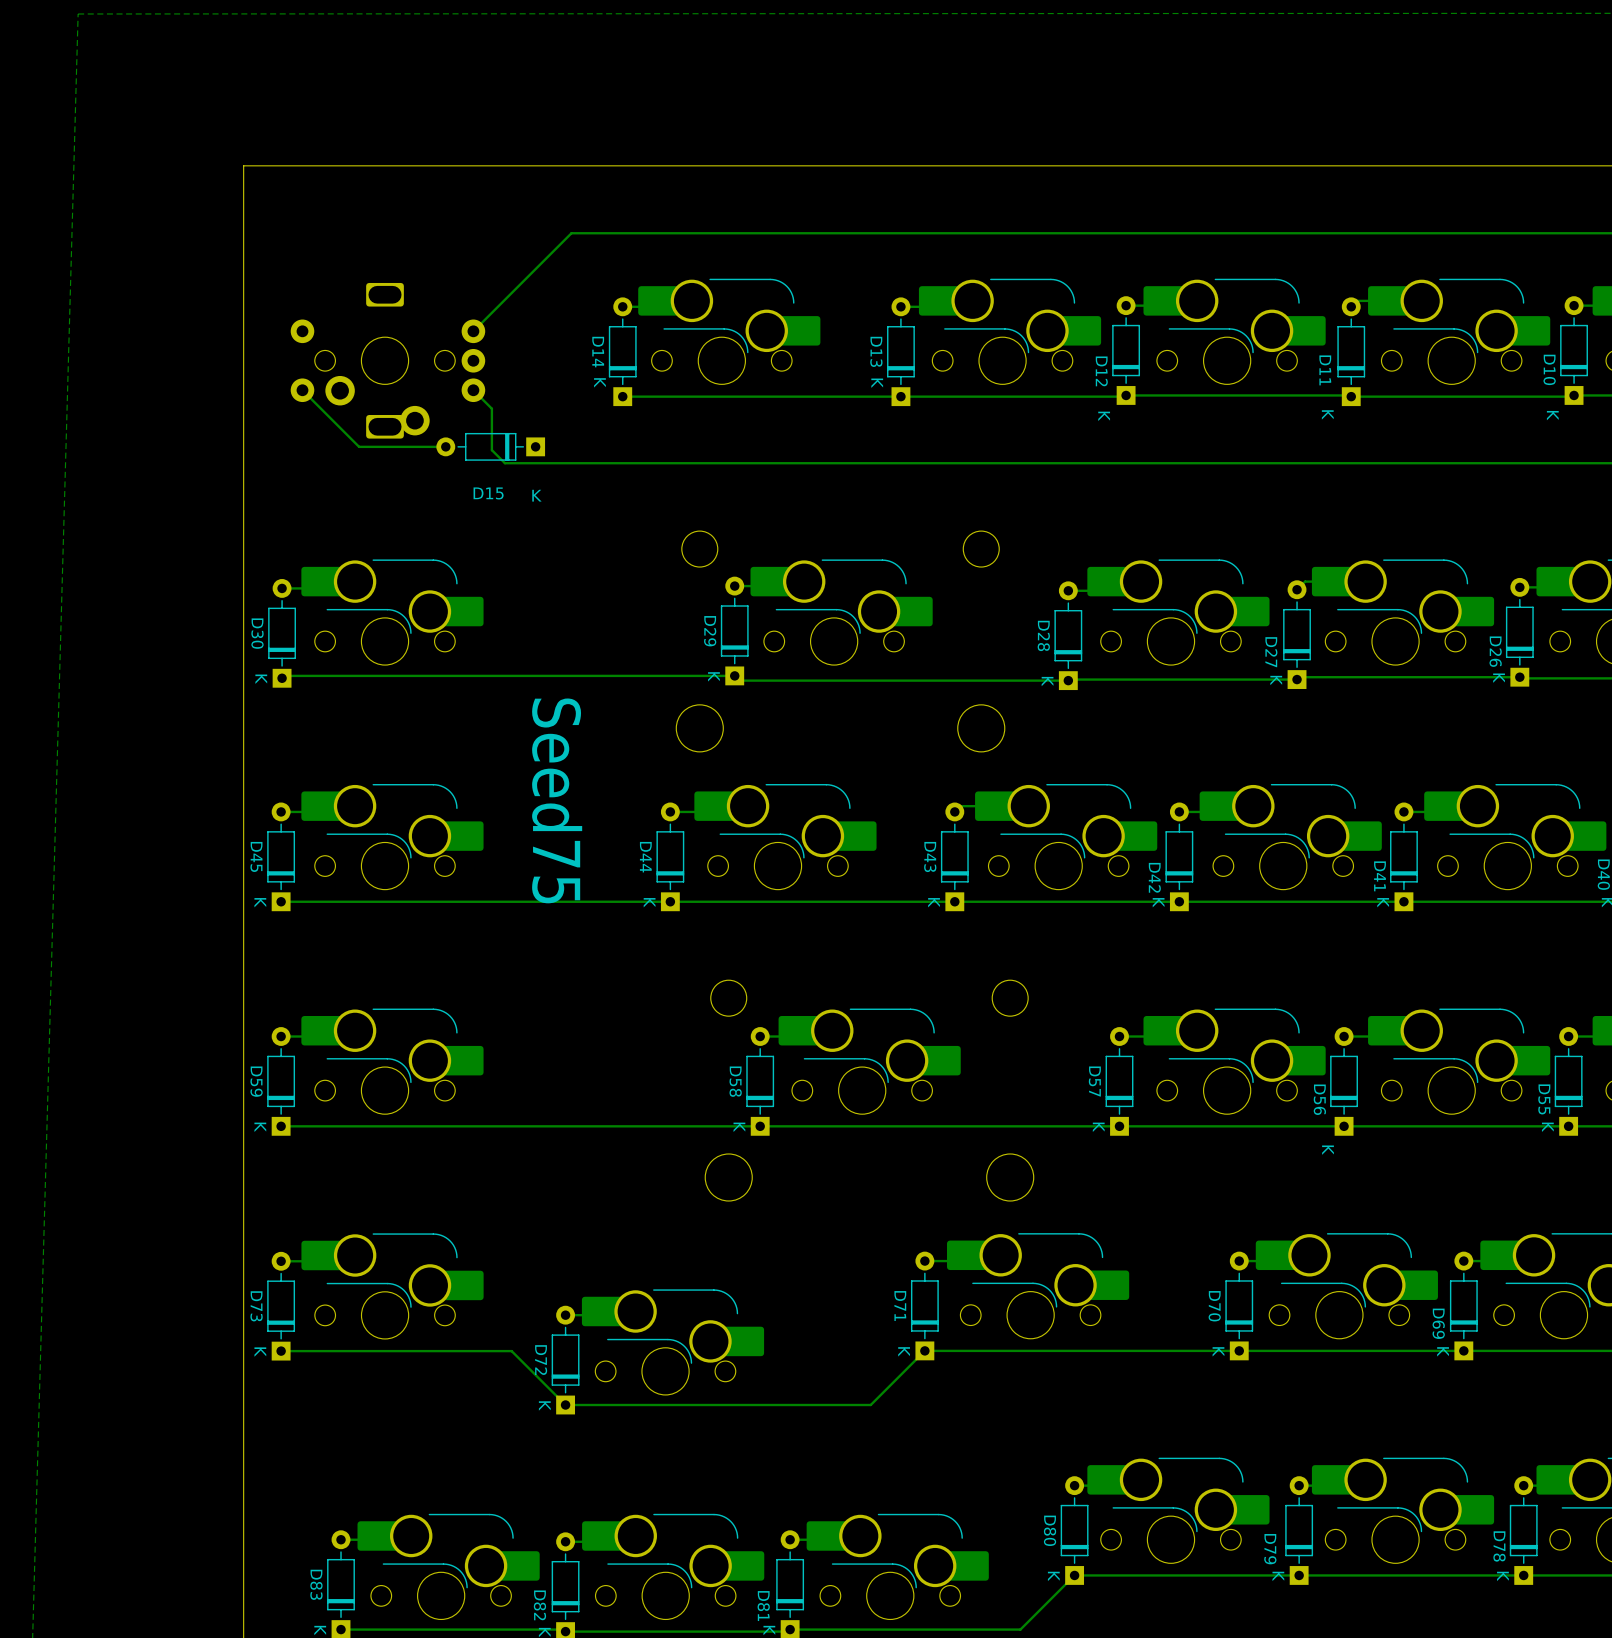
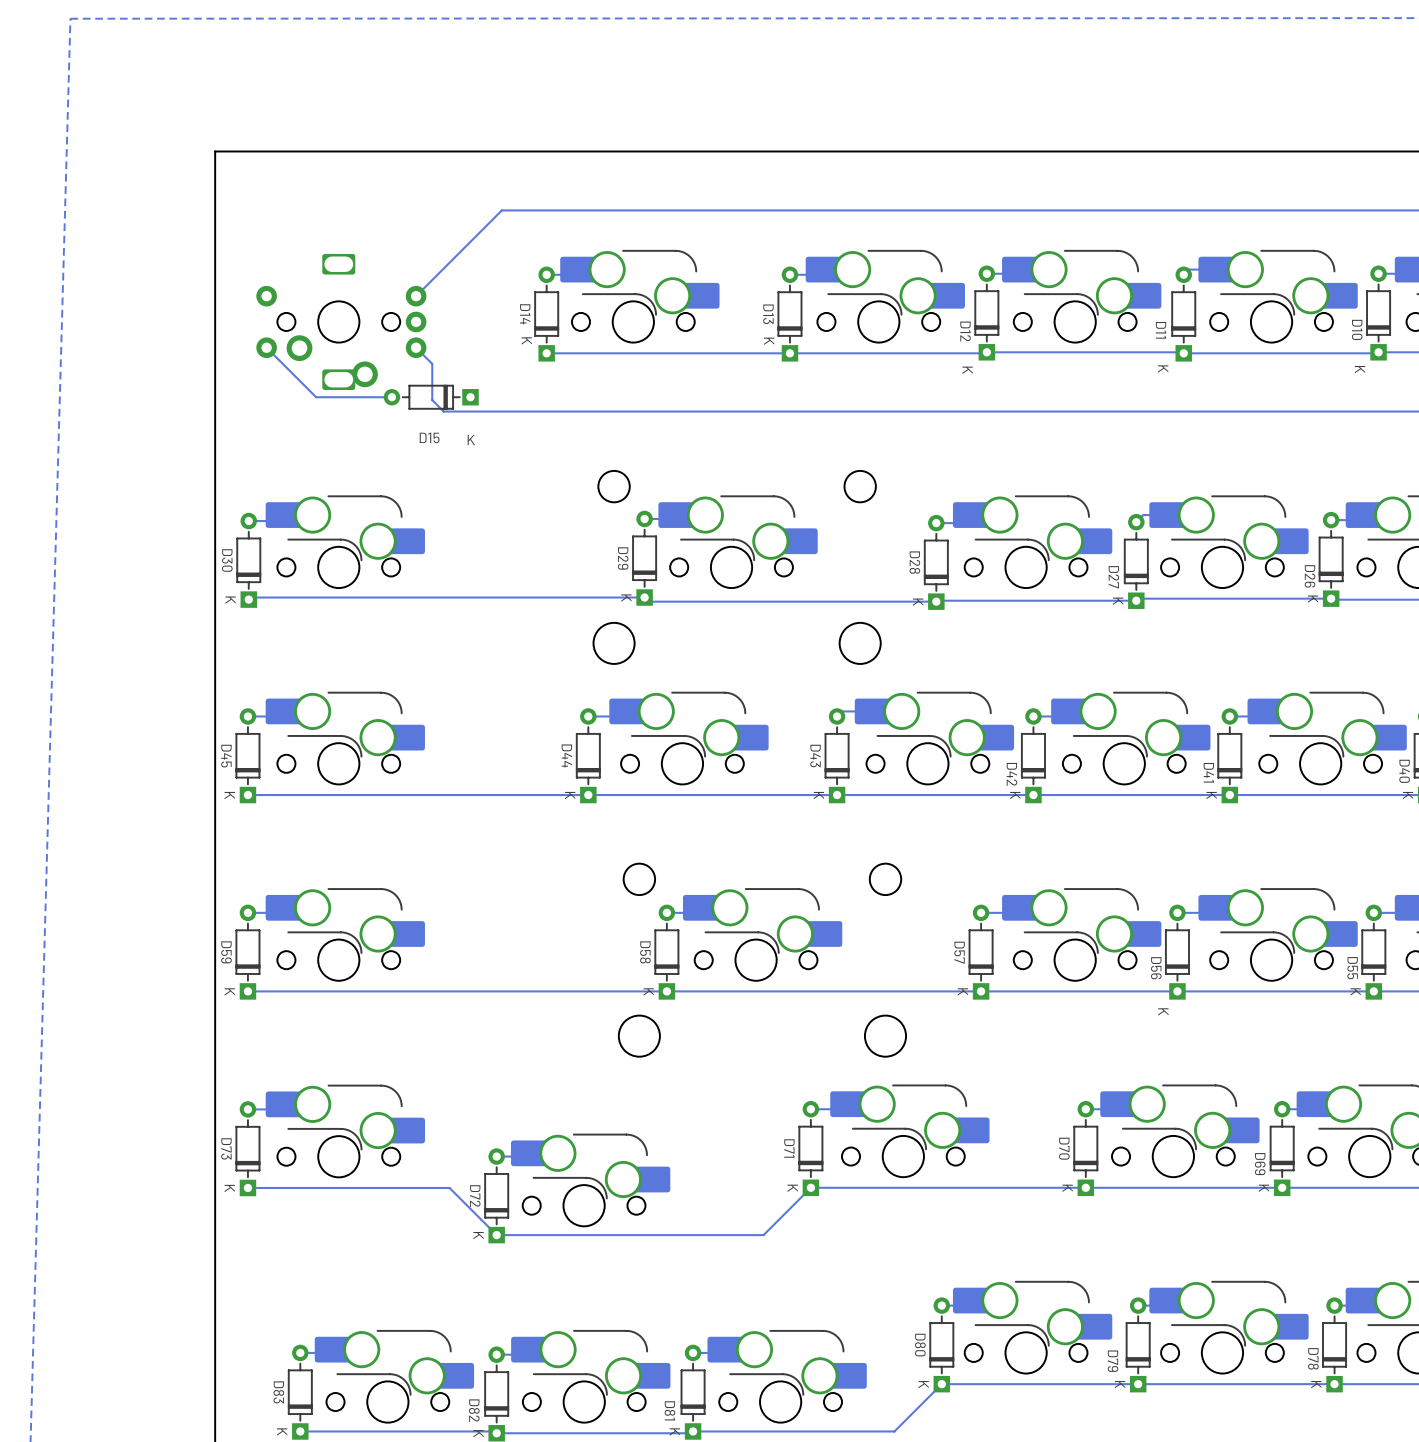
text: Seed75 (557, 800) -> none

